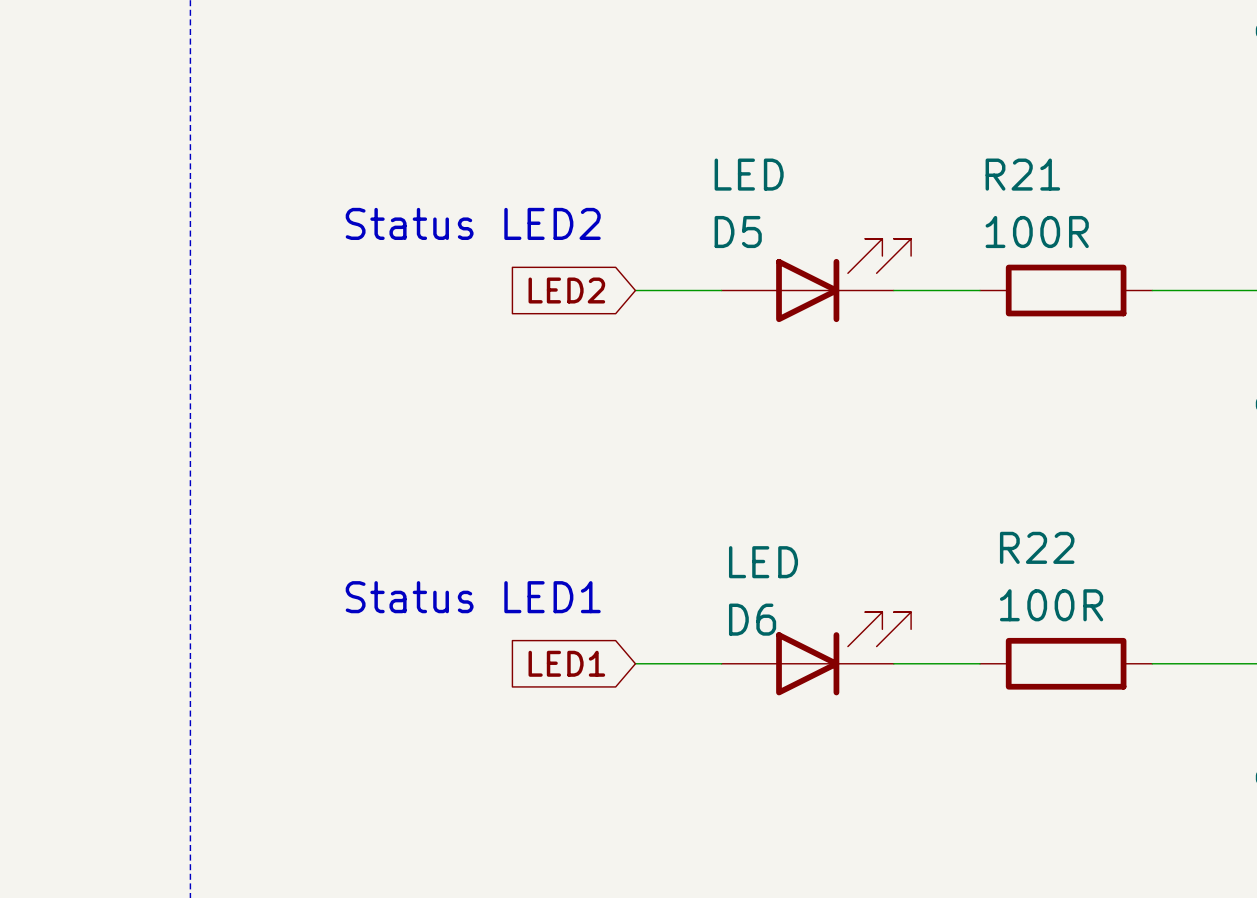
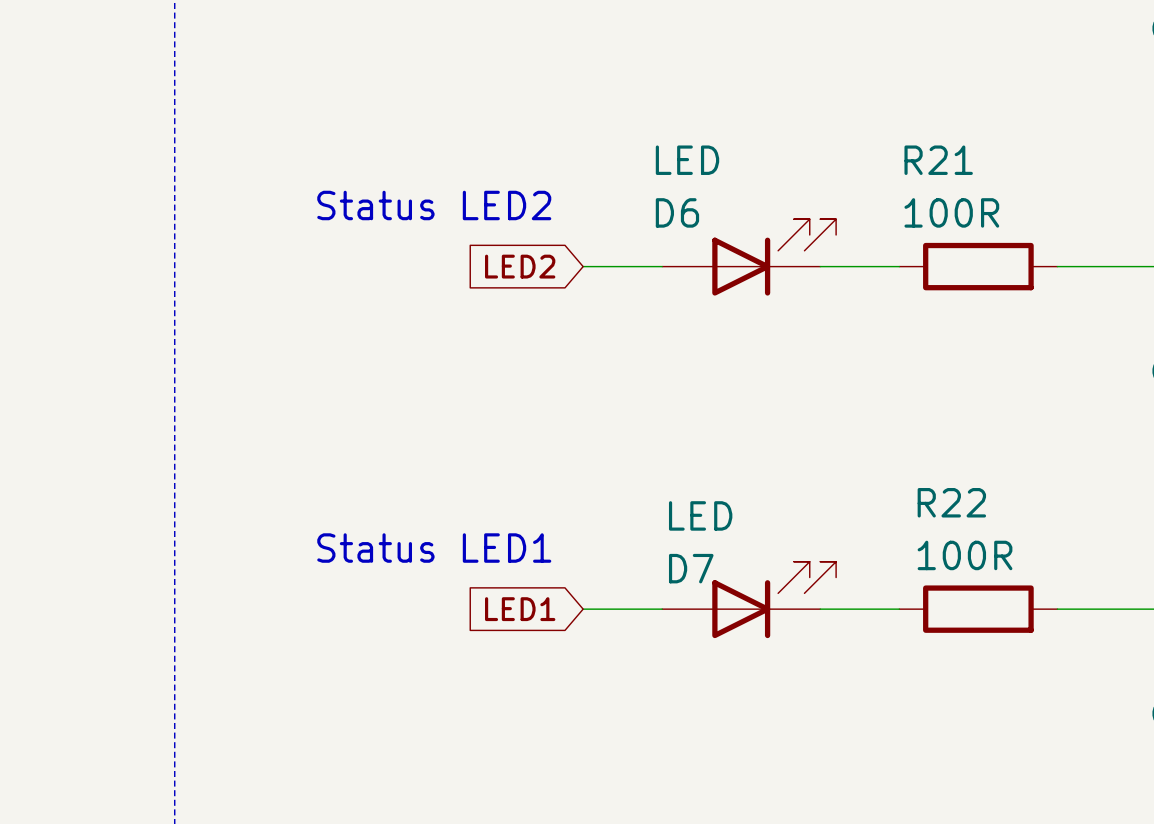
D5 name: D5 (738, 232) -> D6 (677, 212)
D6 name: D6 (752, 619) -> D7 (691, 568)

